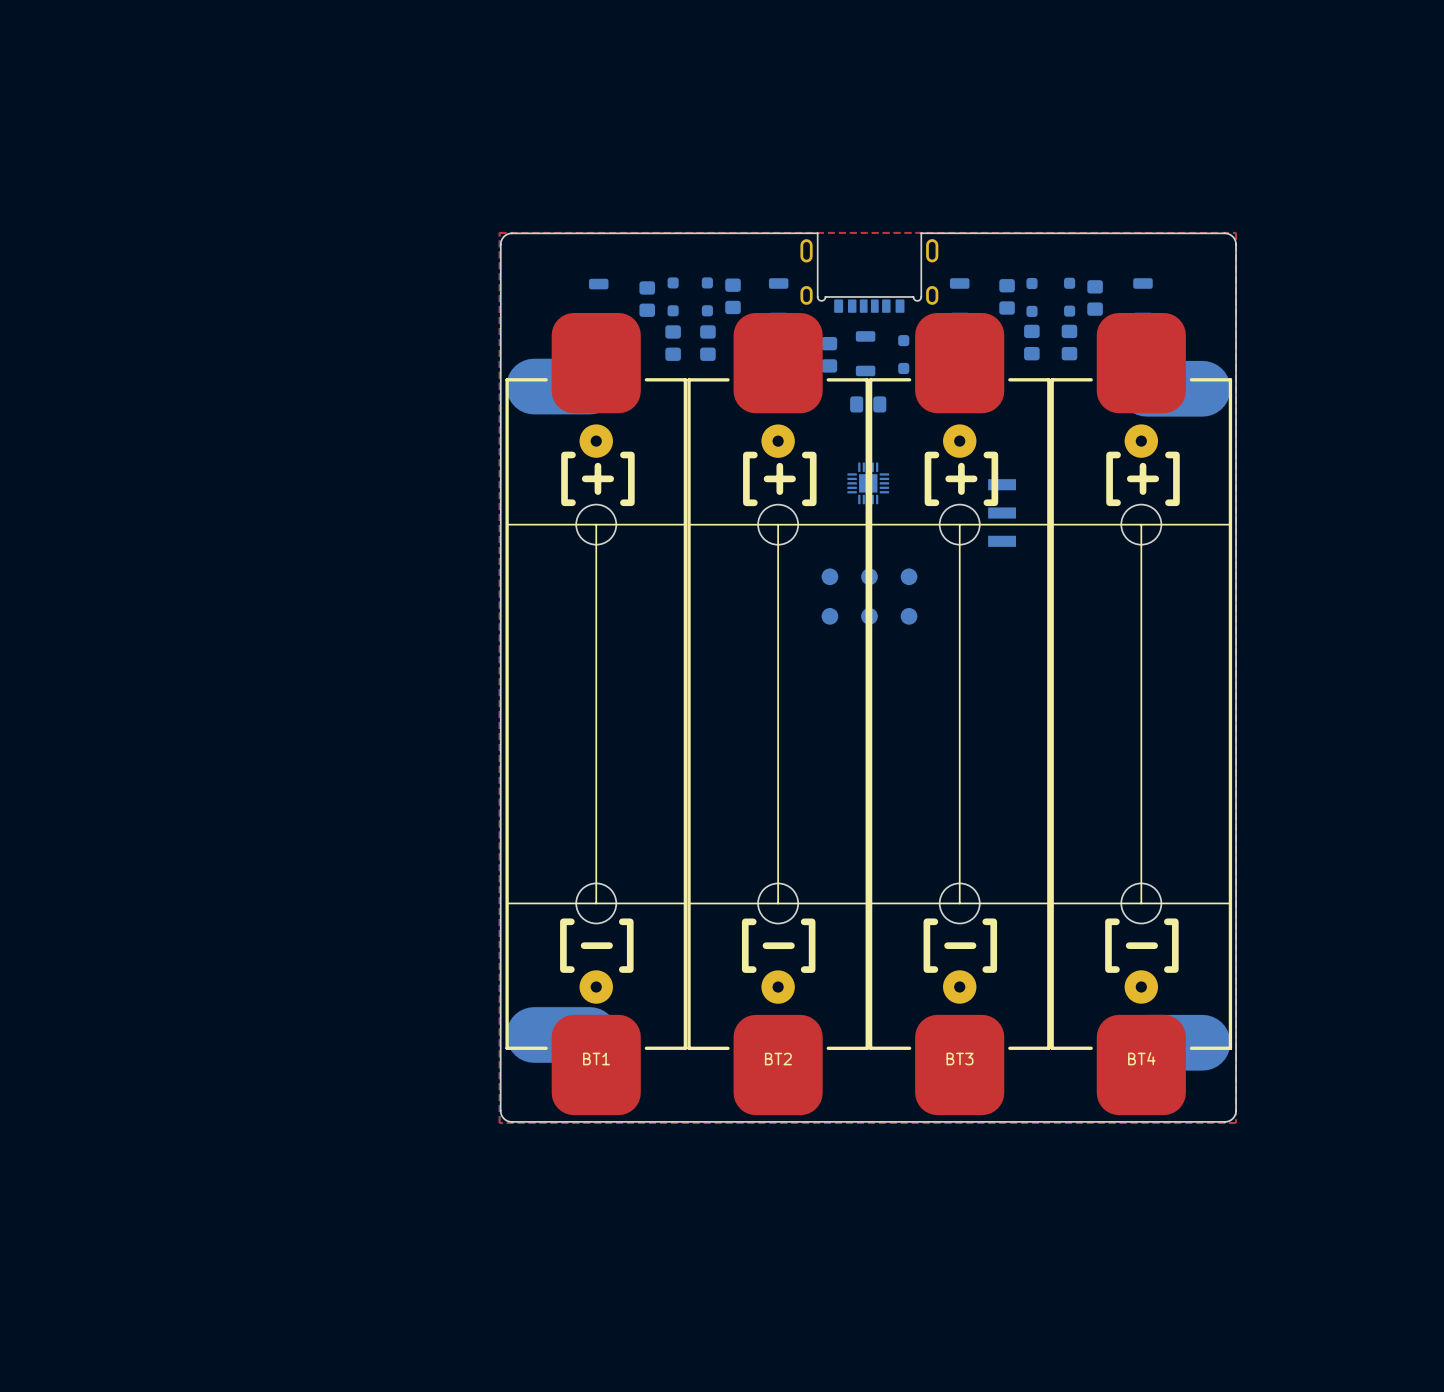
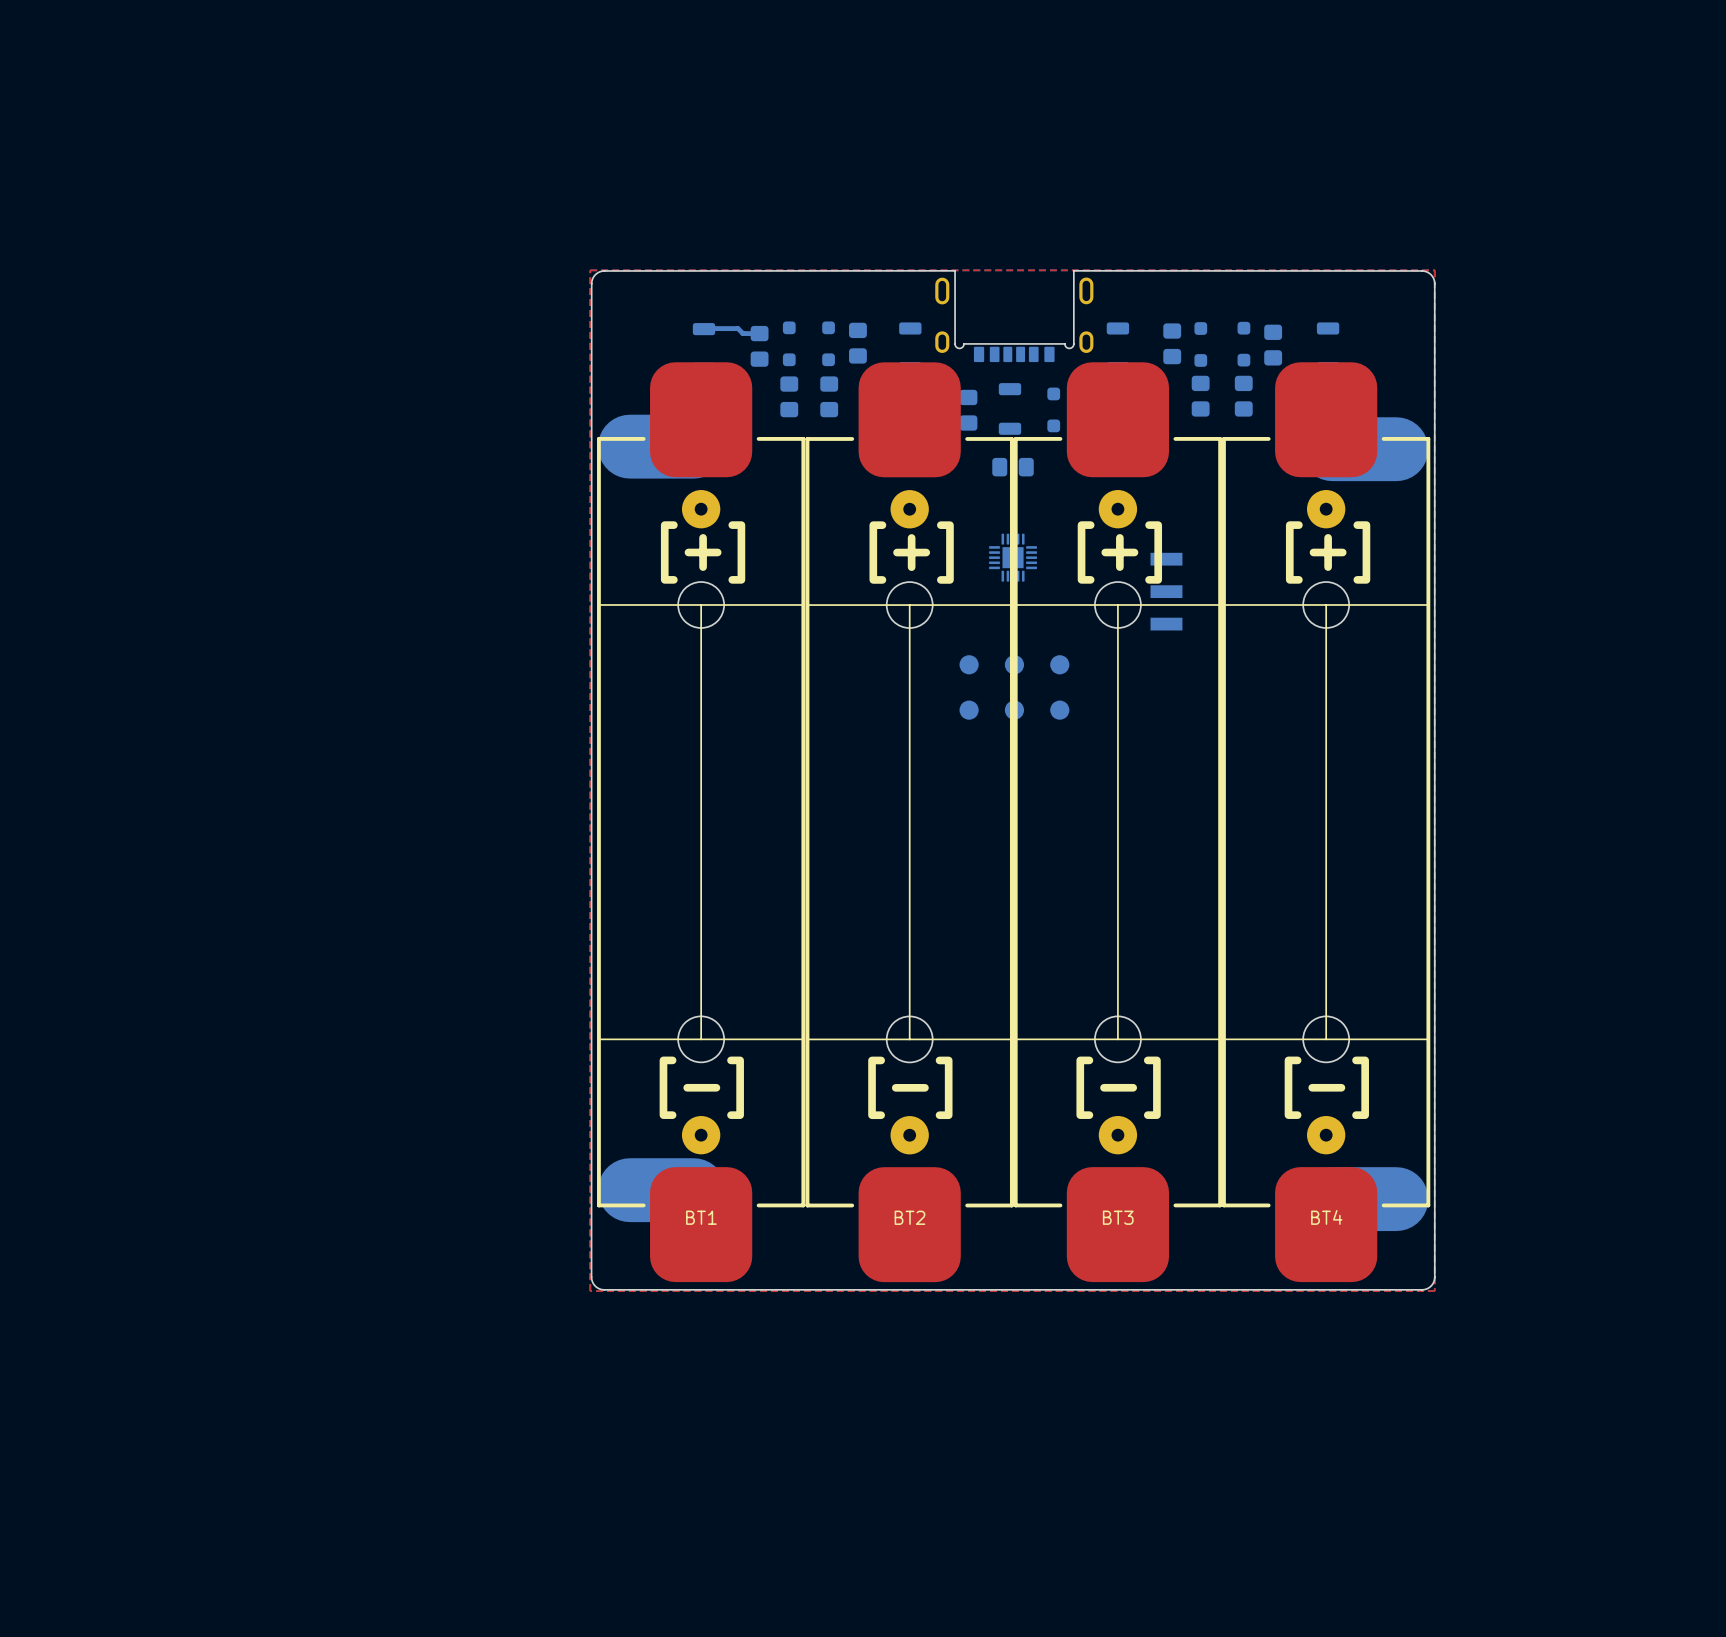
bottom track: none -> (704, 328) (737, 328) (742, 333) (759, 333)

